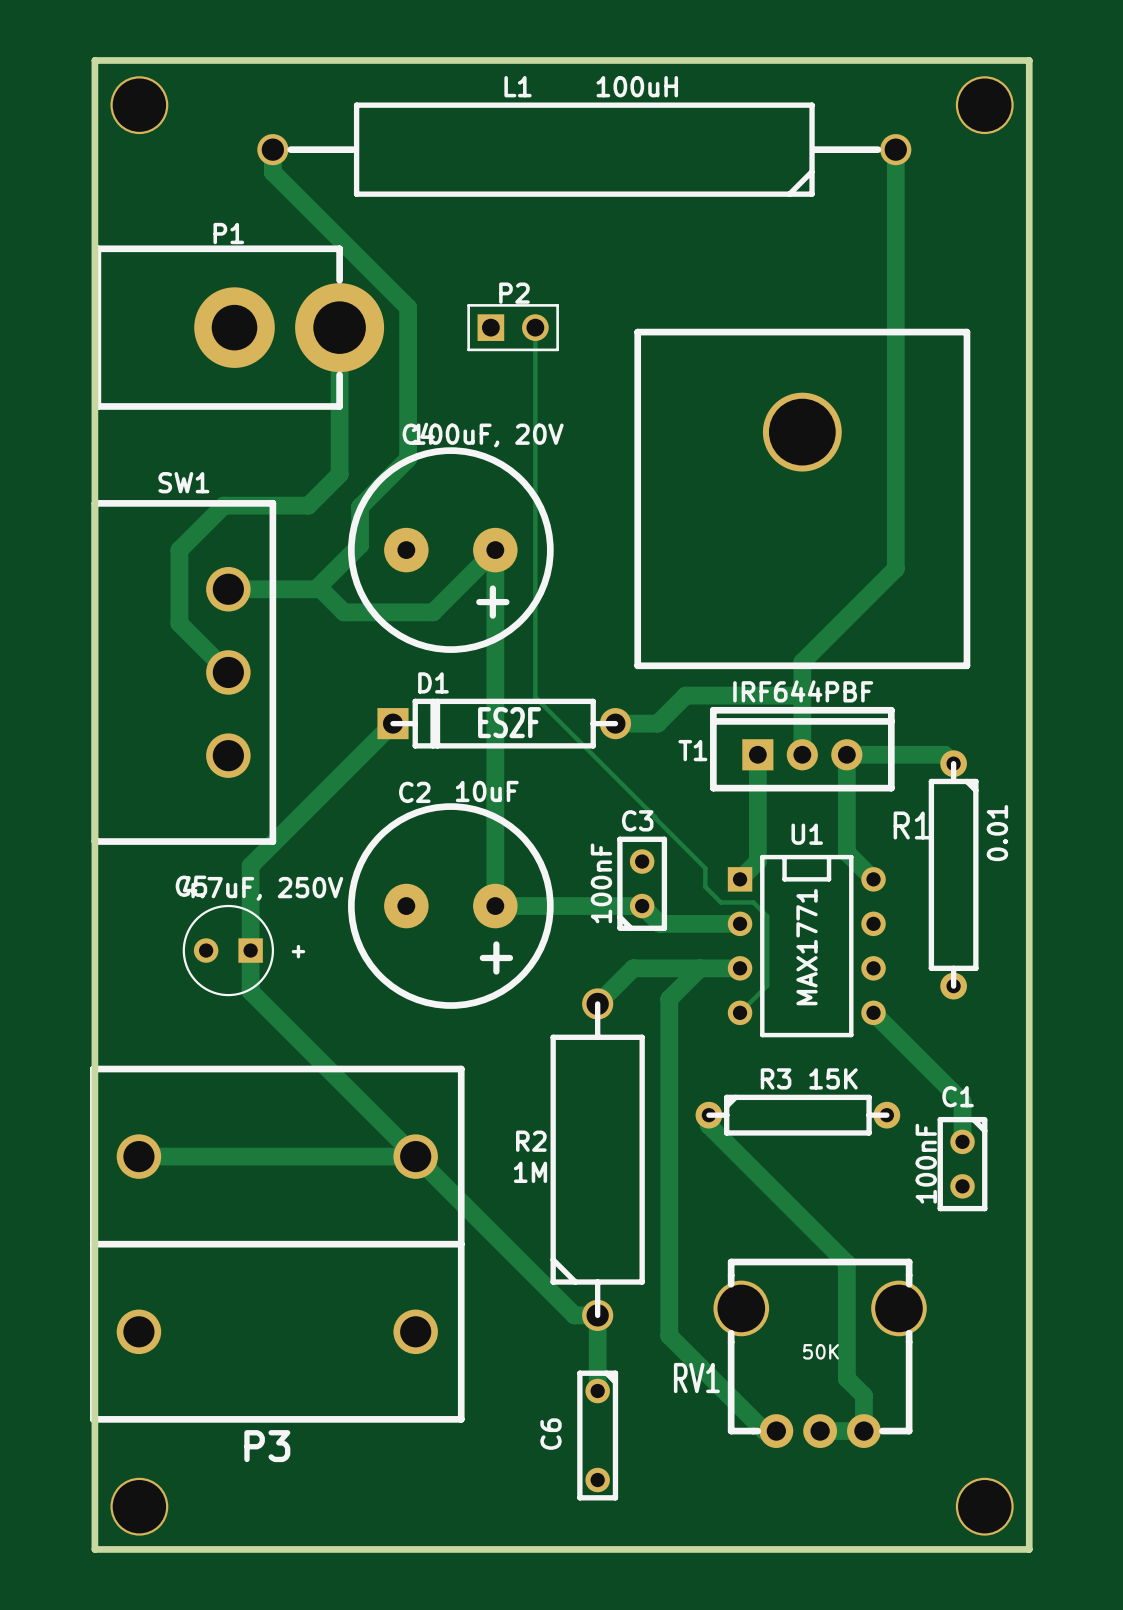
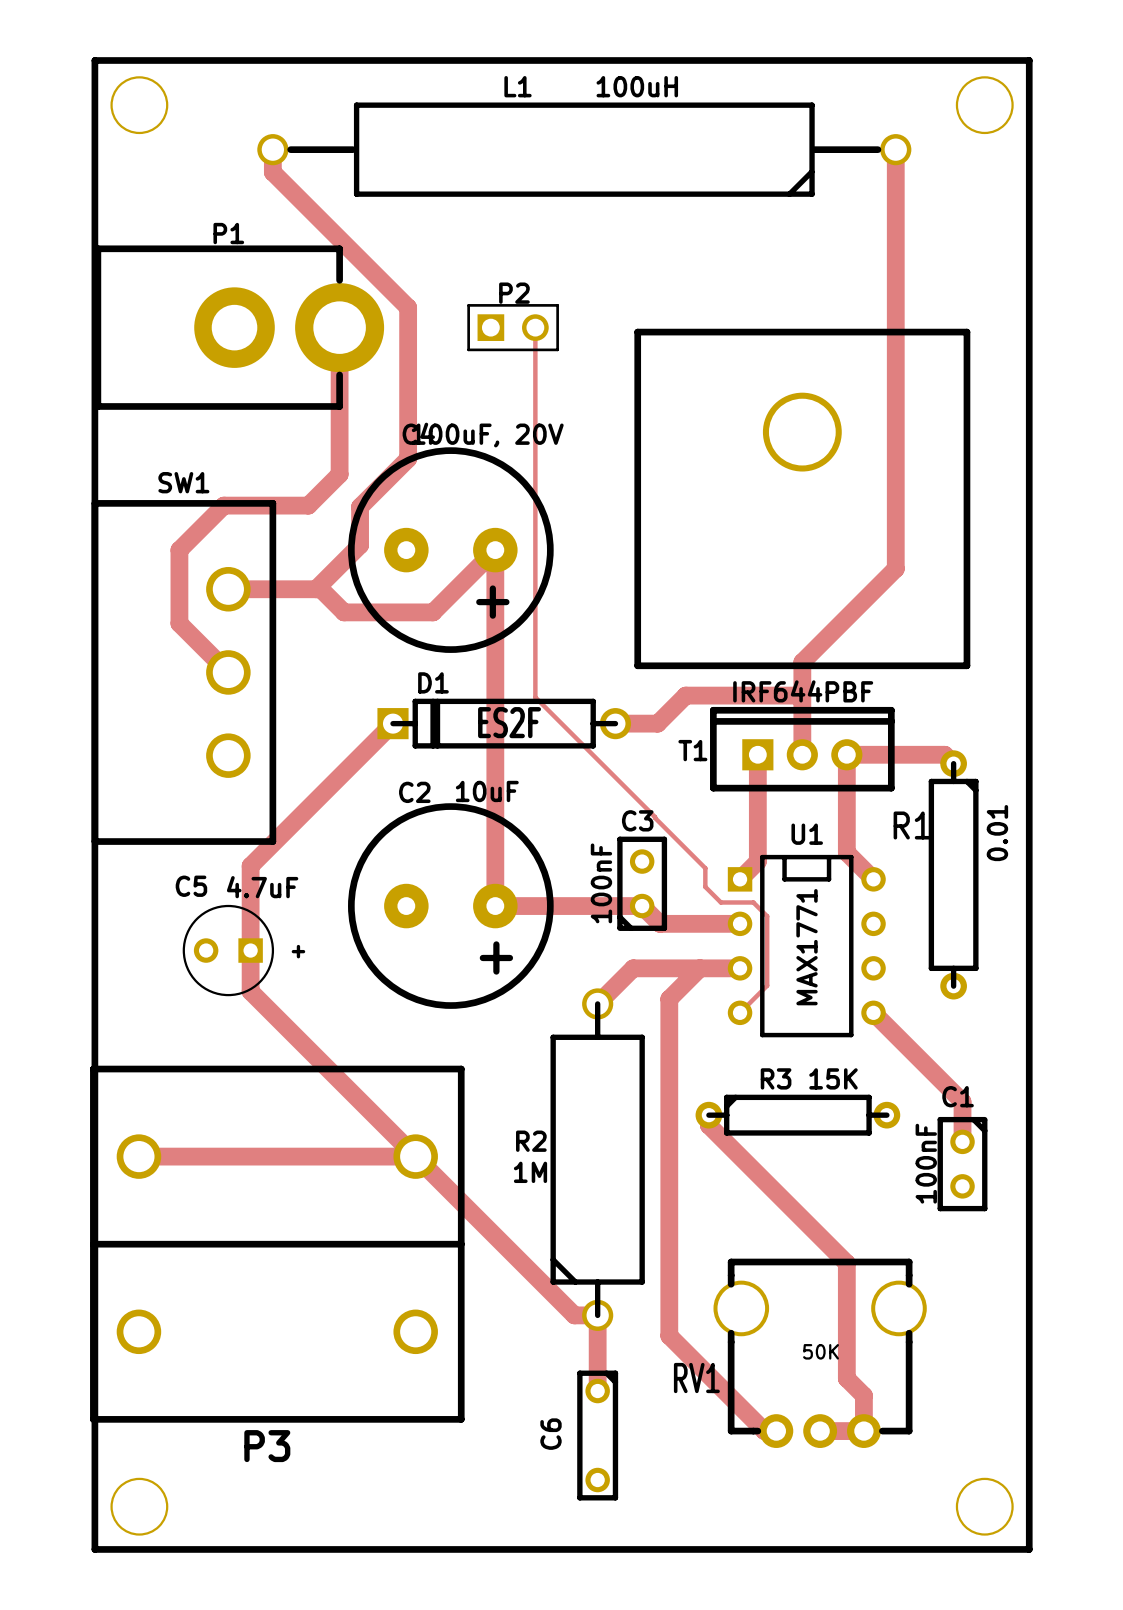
C5 value: 4.7uF, 250V (263, 888) -> 4.7uF (262, 887)

